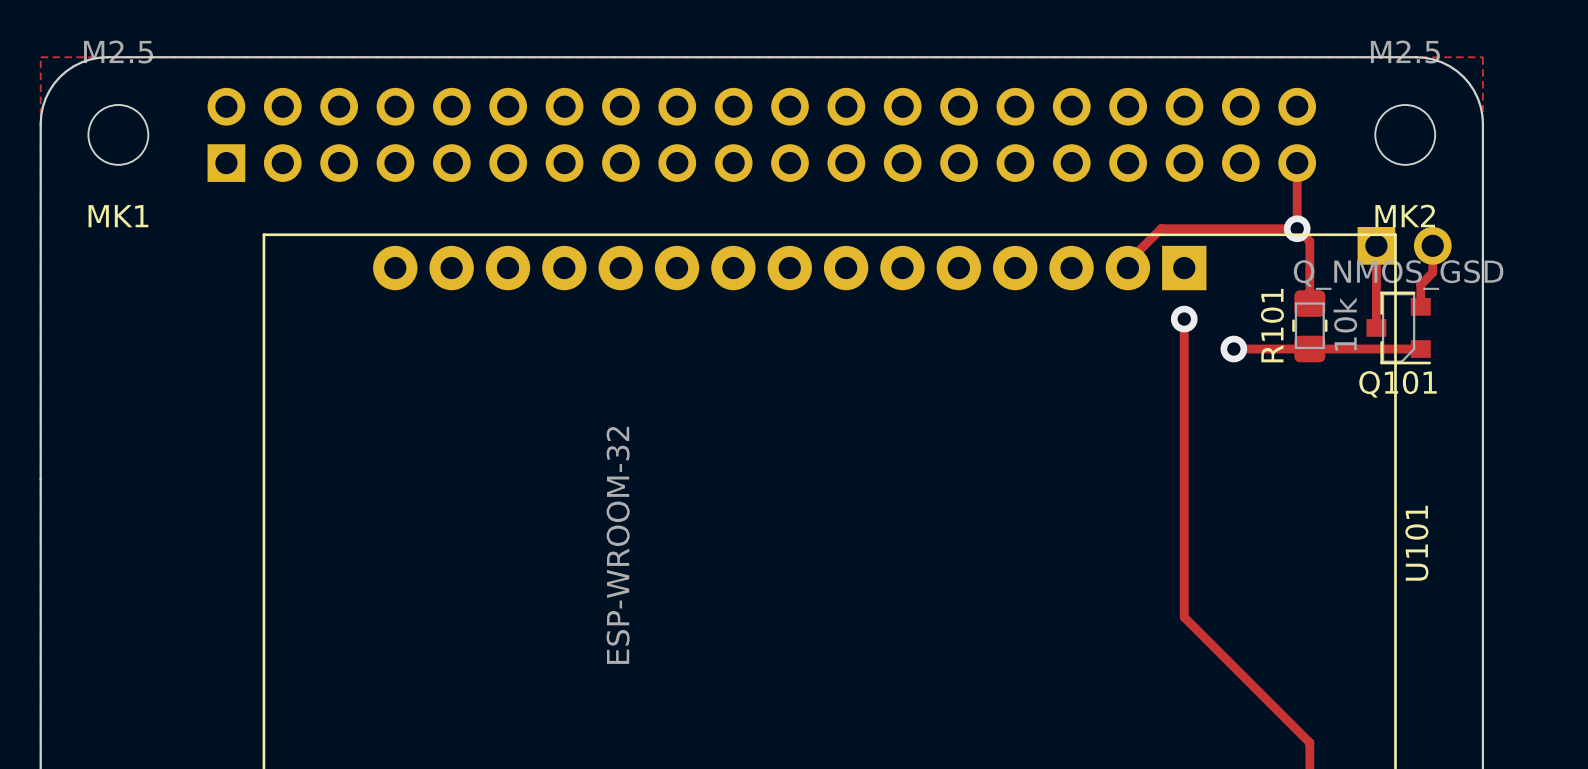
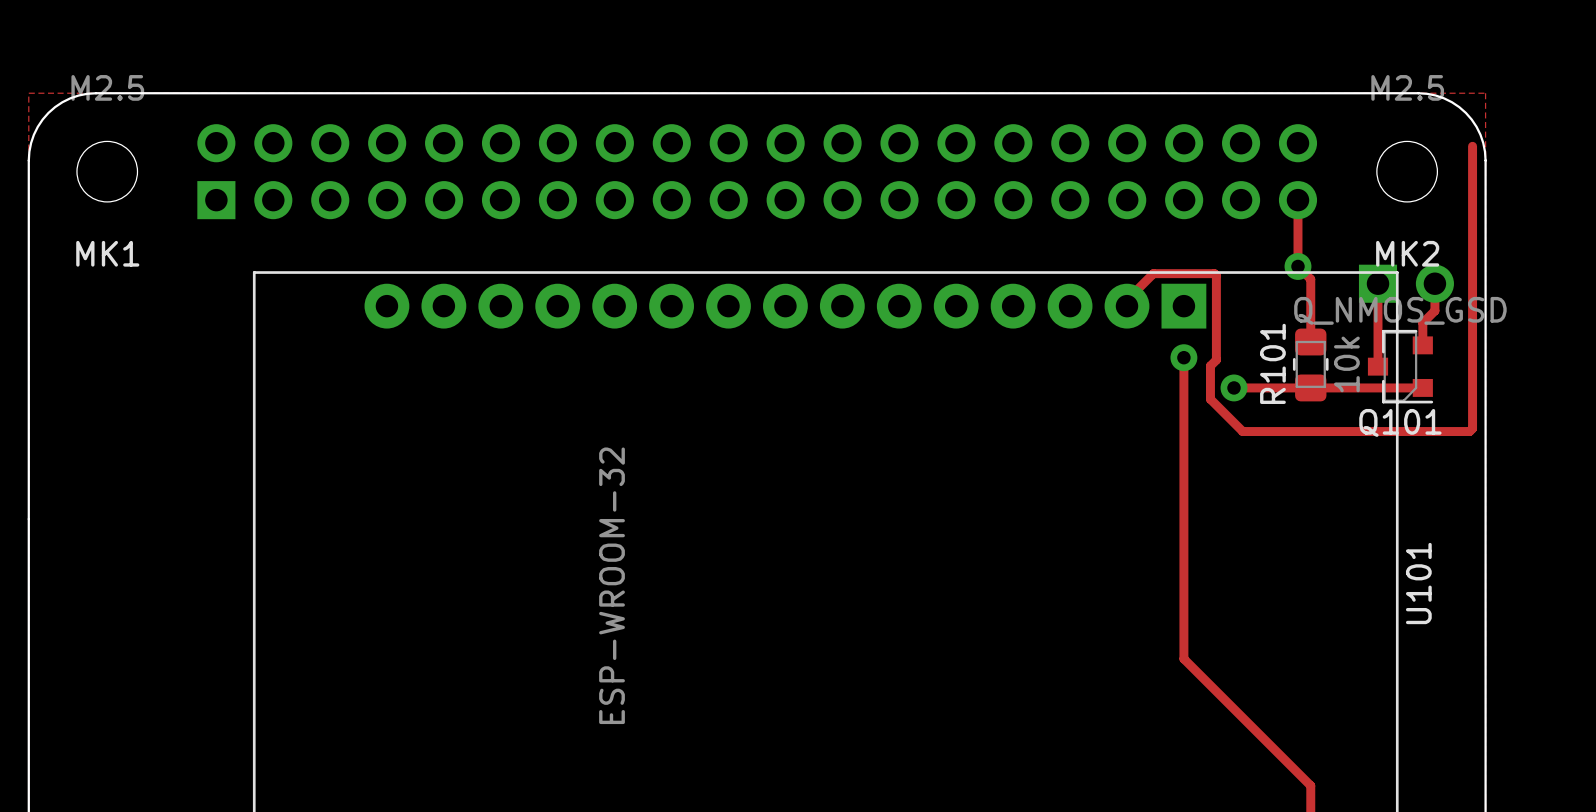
track: (1297, 228) (1161, 228) (1154, 235) -> (1472, 146) (1472, 428) (1469, 431) (1242, 431) (1210, 399) (1210, 365) (1216, 360) (1216, 275) (1214, 273) (1153, 273)

